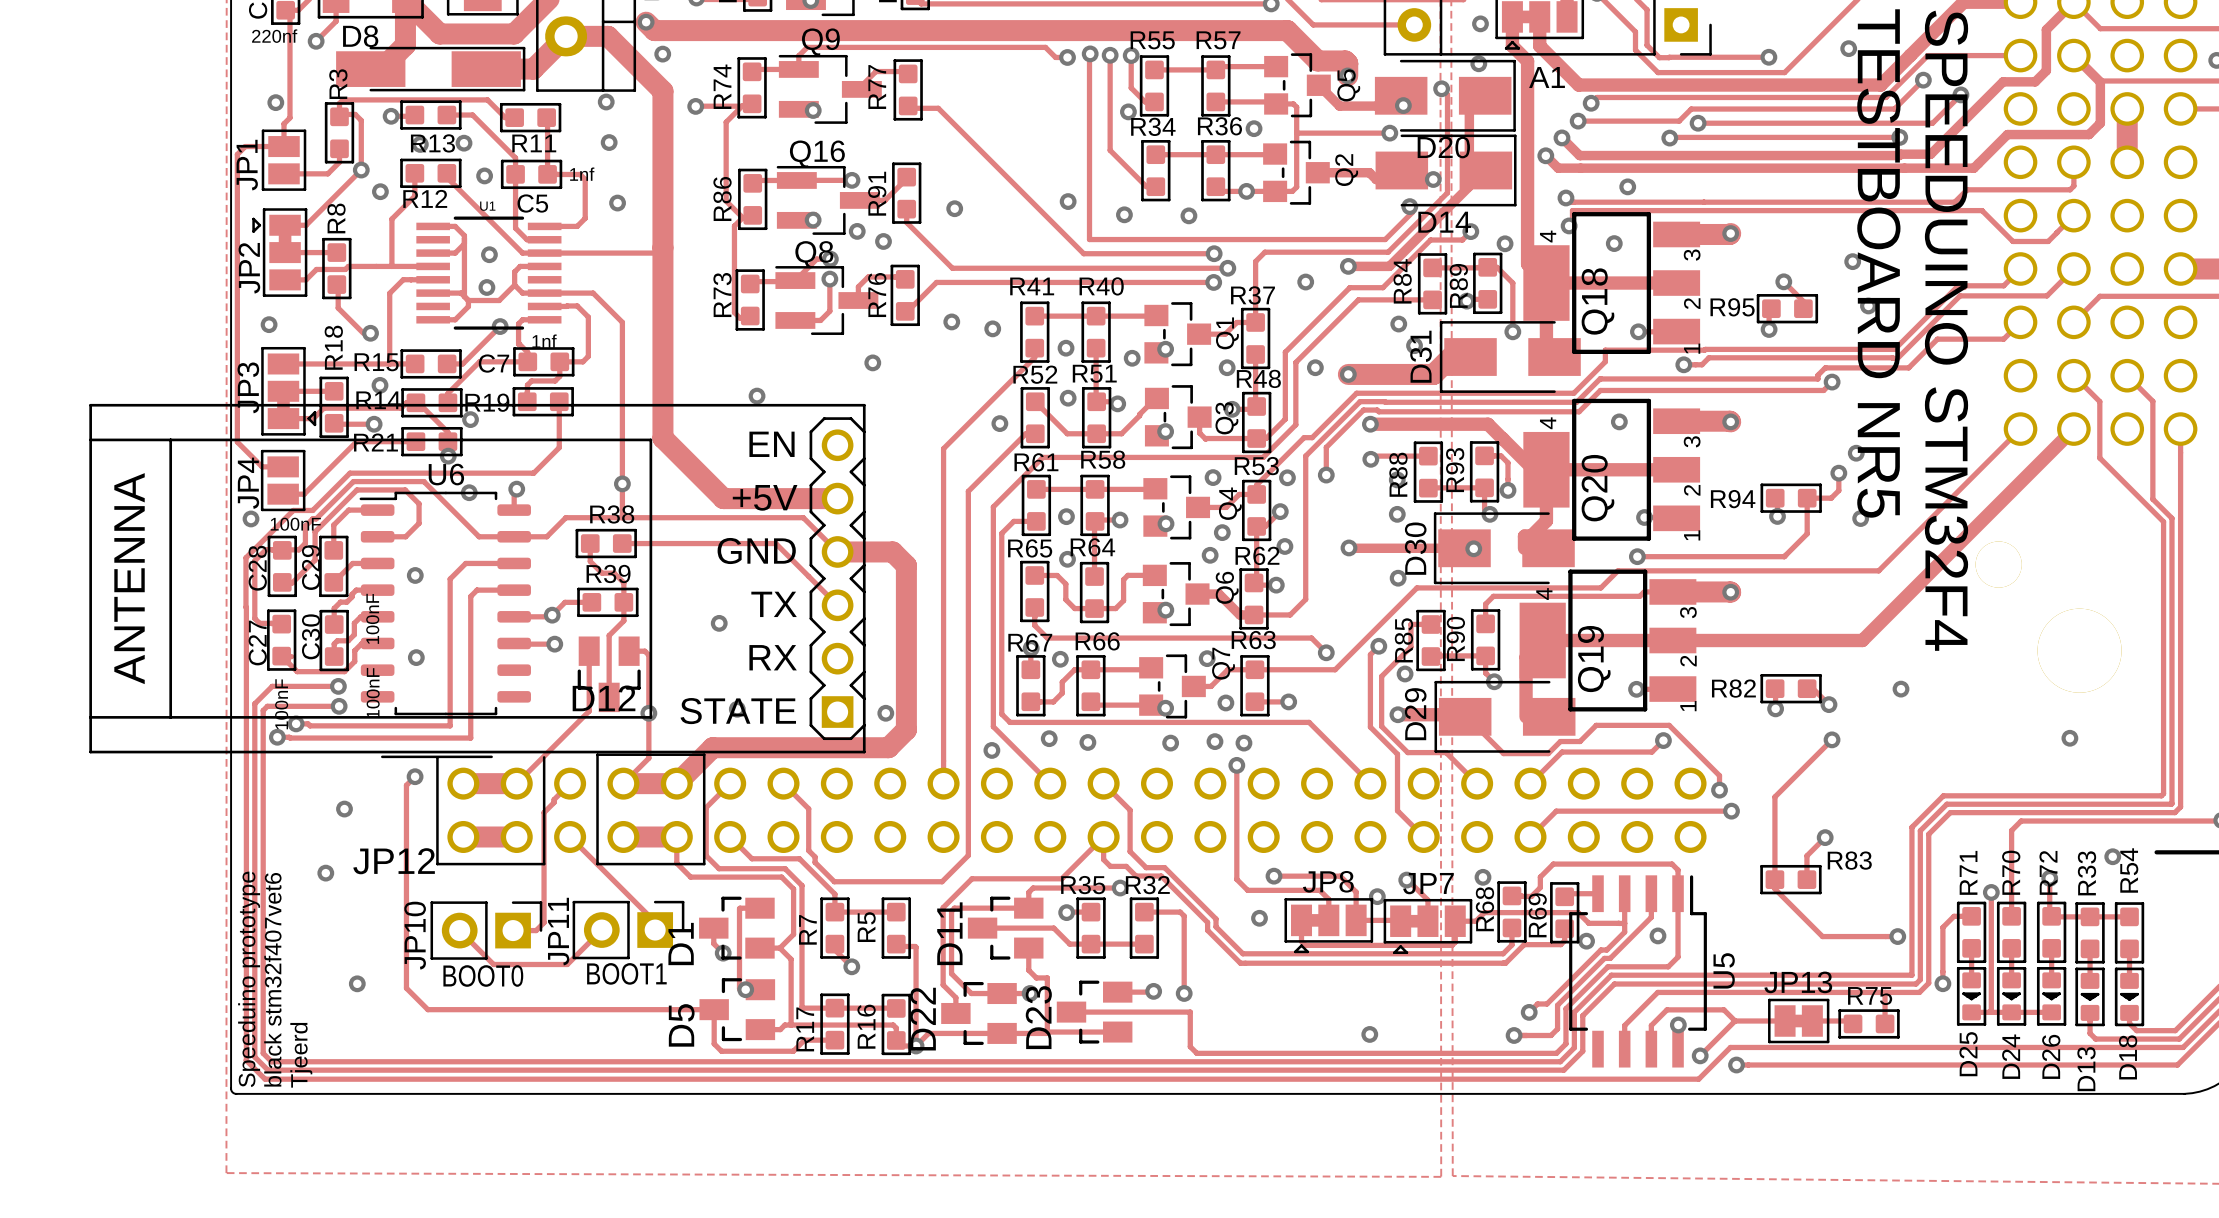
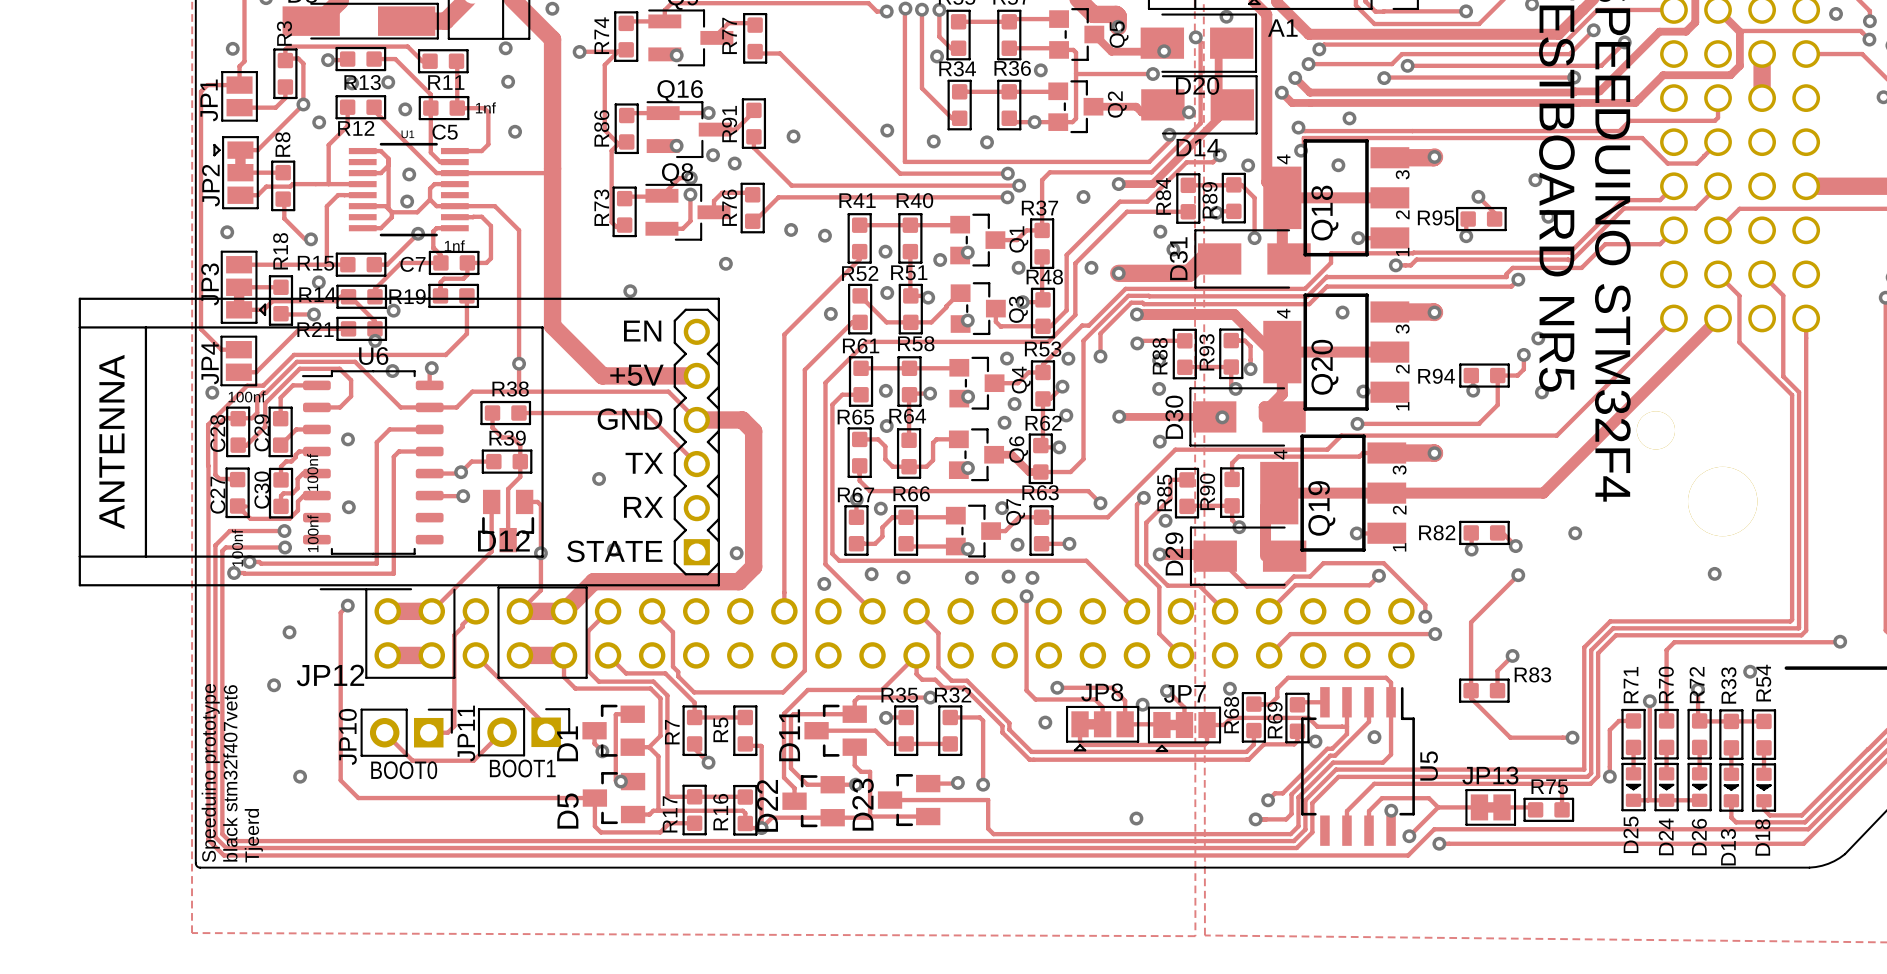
C28 value: 100nF (295, 524) -> 100nf (247, 396)
C29 value: 100nF (372, 618) -> 100nf (312, 472)
C30 value: 100nF (373, 692) -> 100nf (312, 533)
C27 value: 100nF (281, 704) -> 100nf (237, 548)

